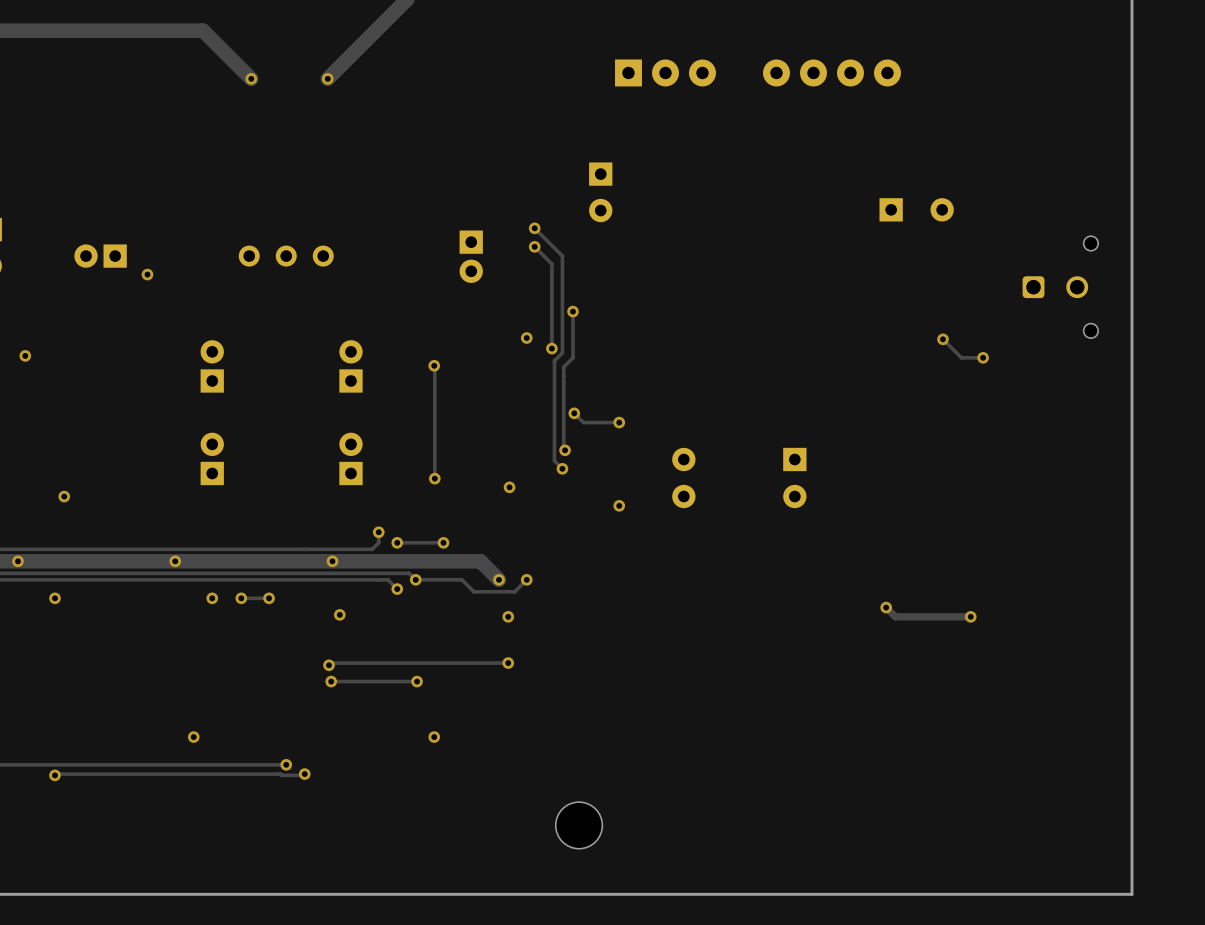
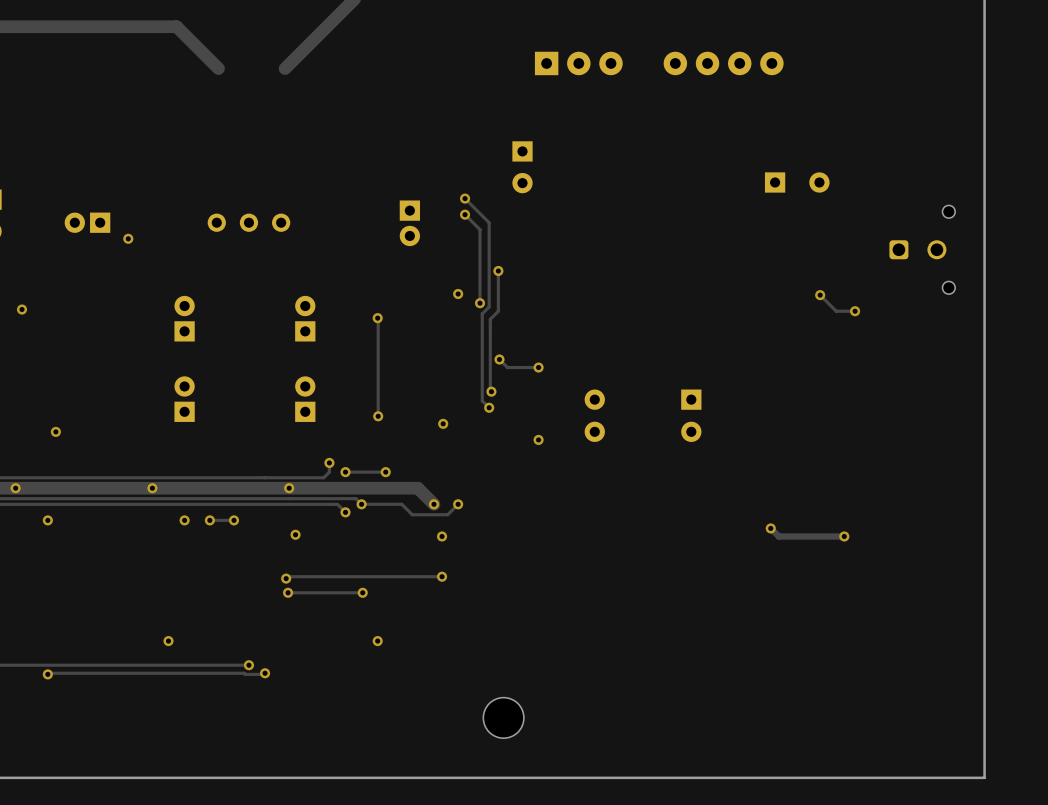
via: (251, 78) -> none
via: (327, 78) -> none

